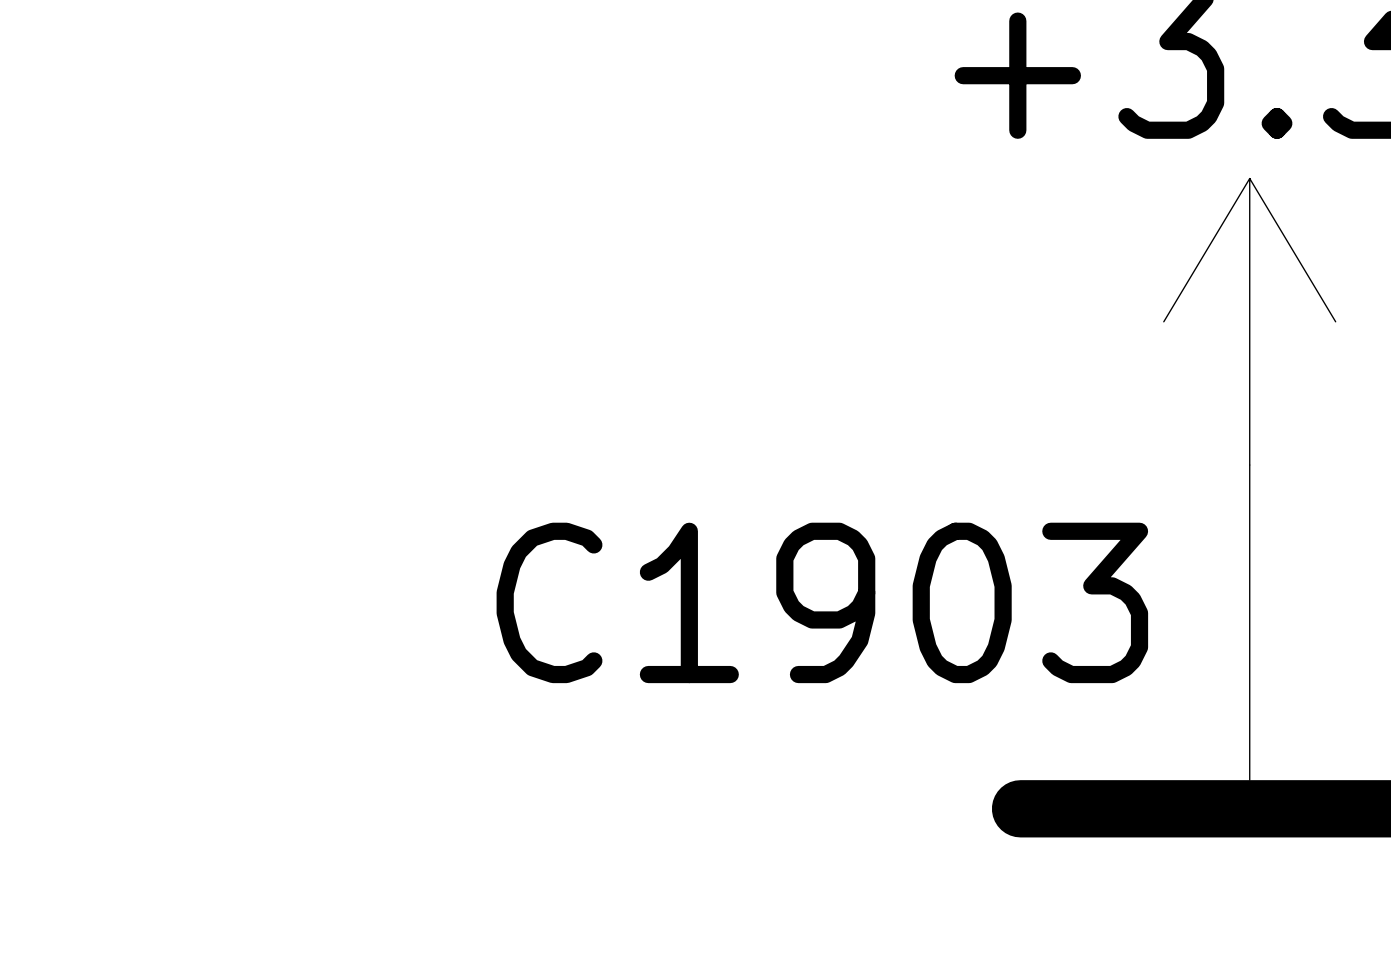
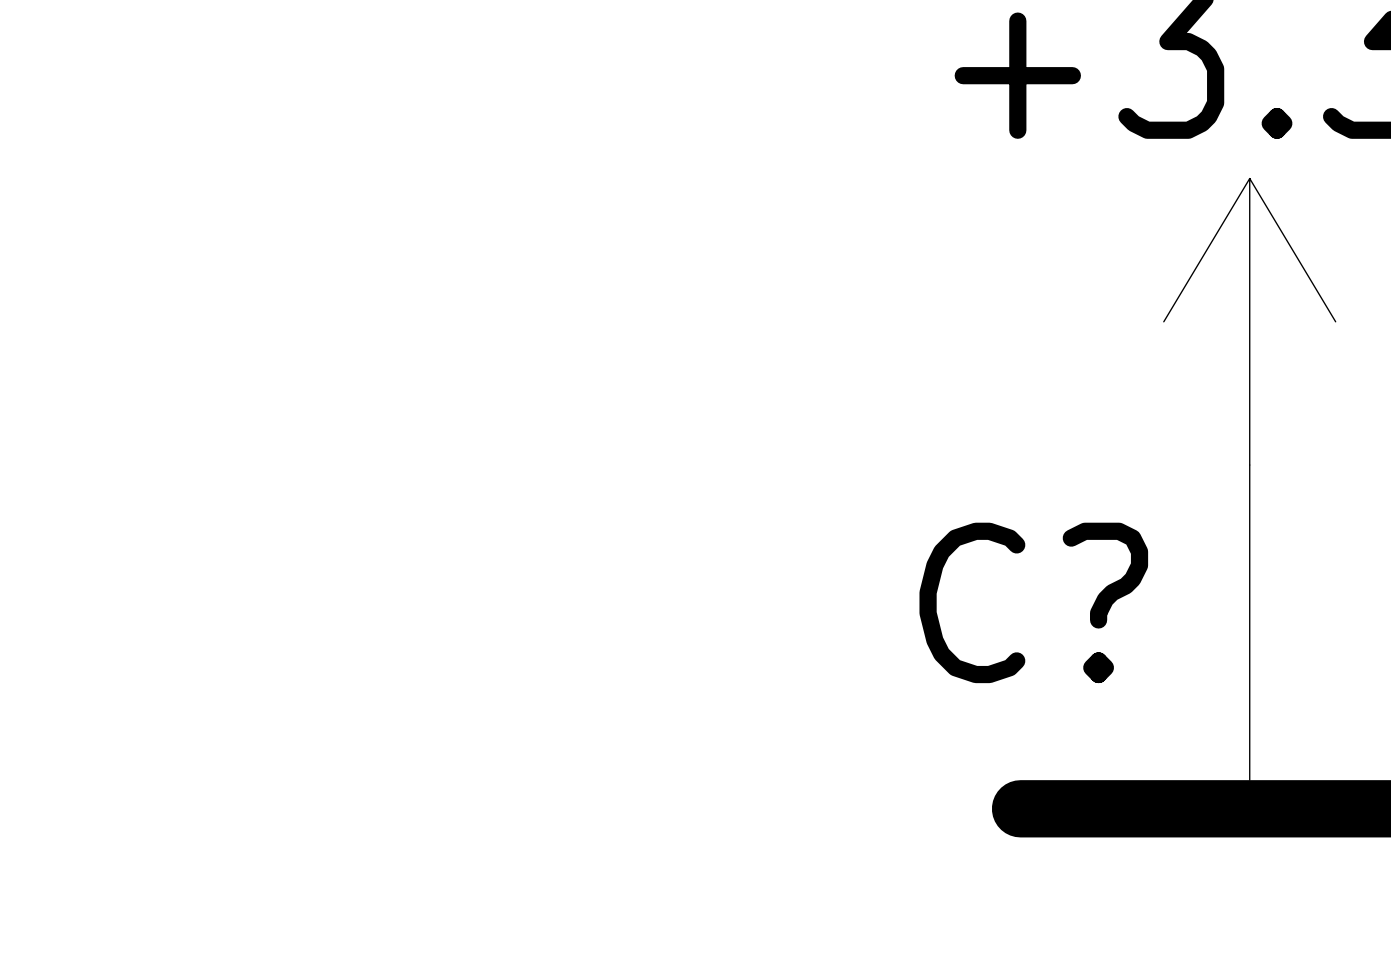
C1903 name: C1903 (822, 602) -> C? (1033, 602)

